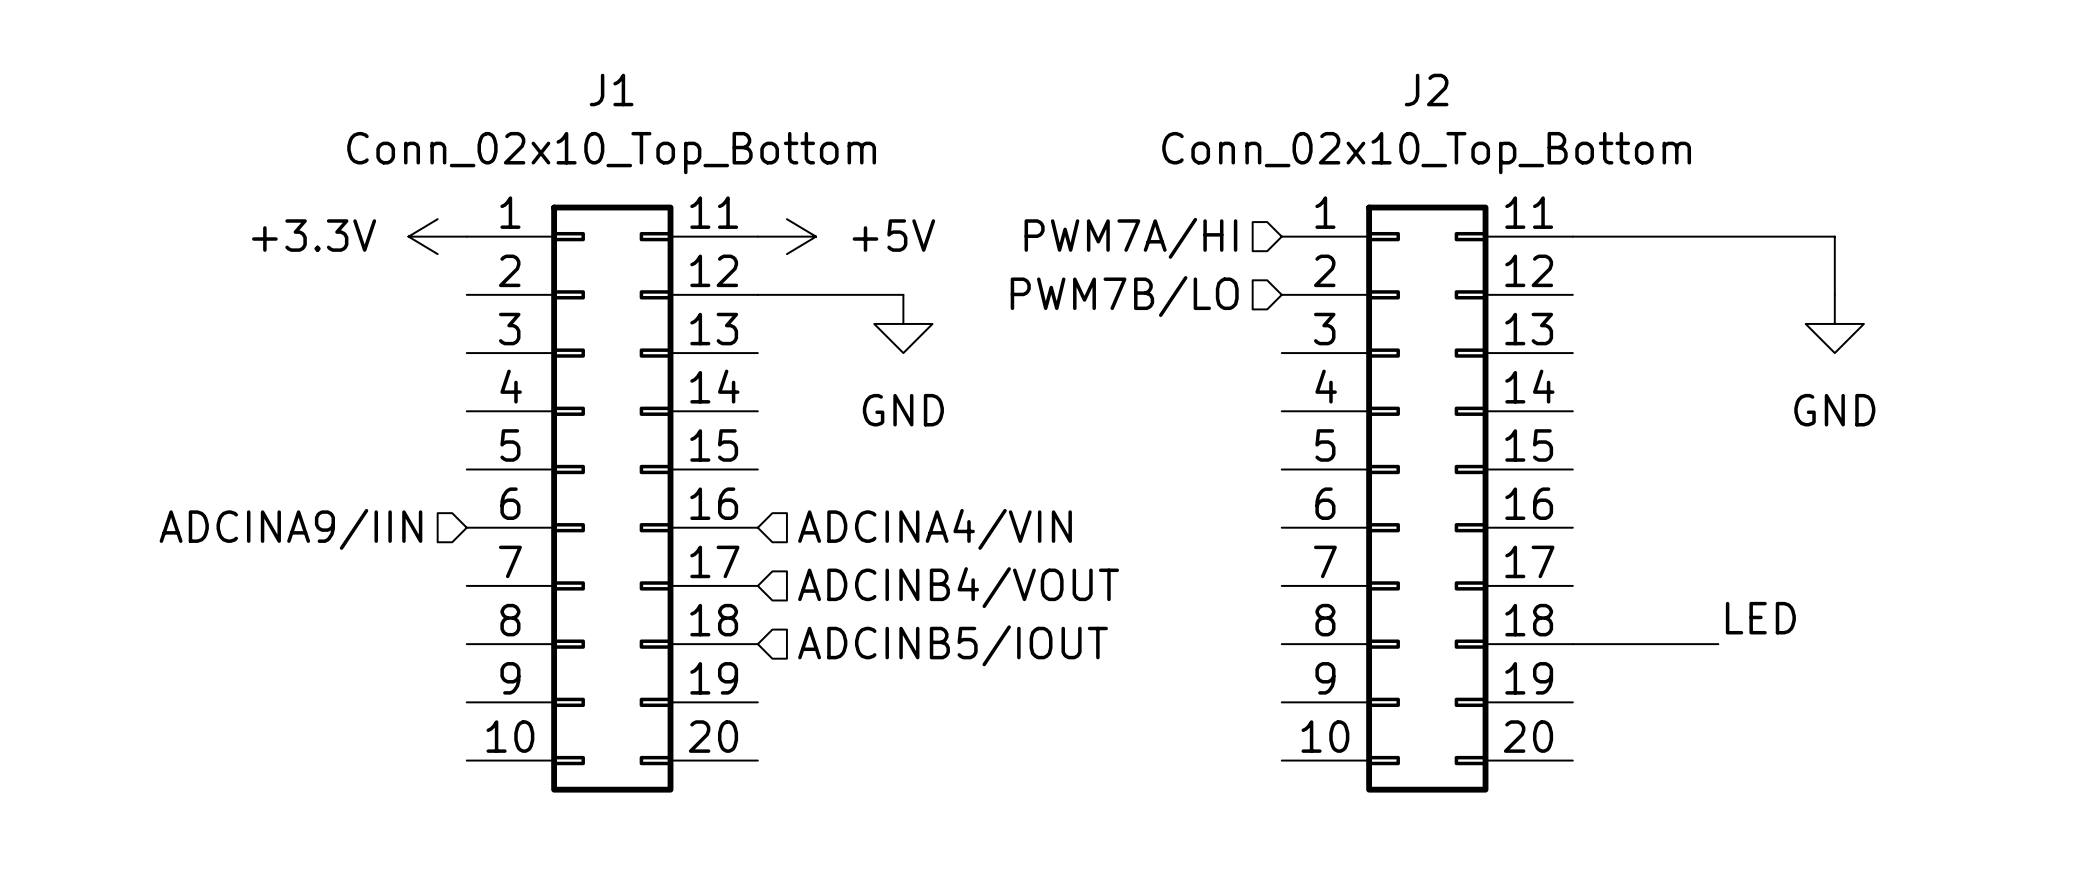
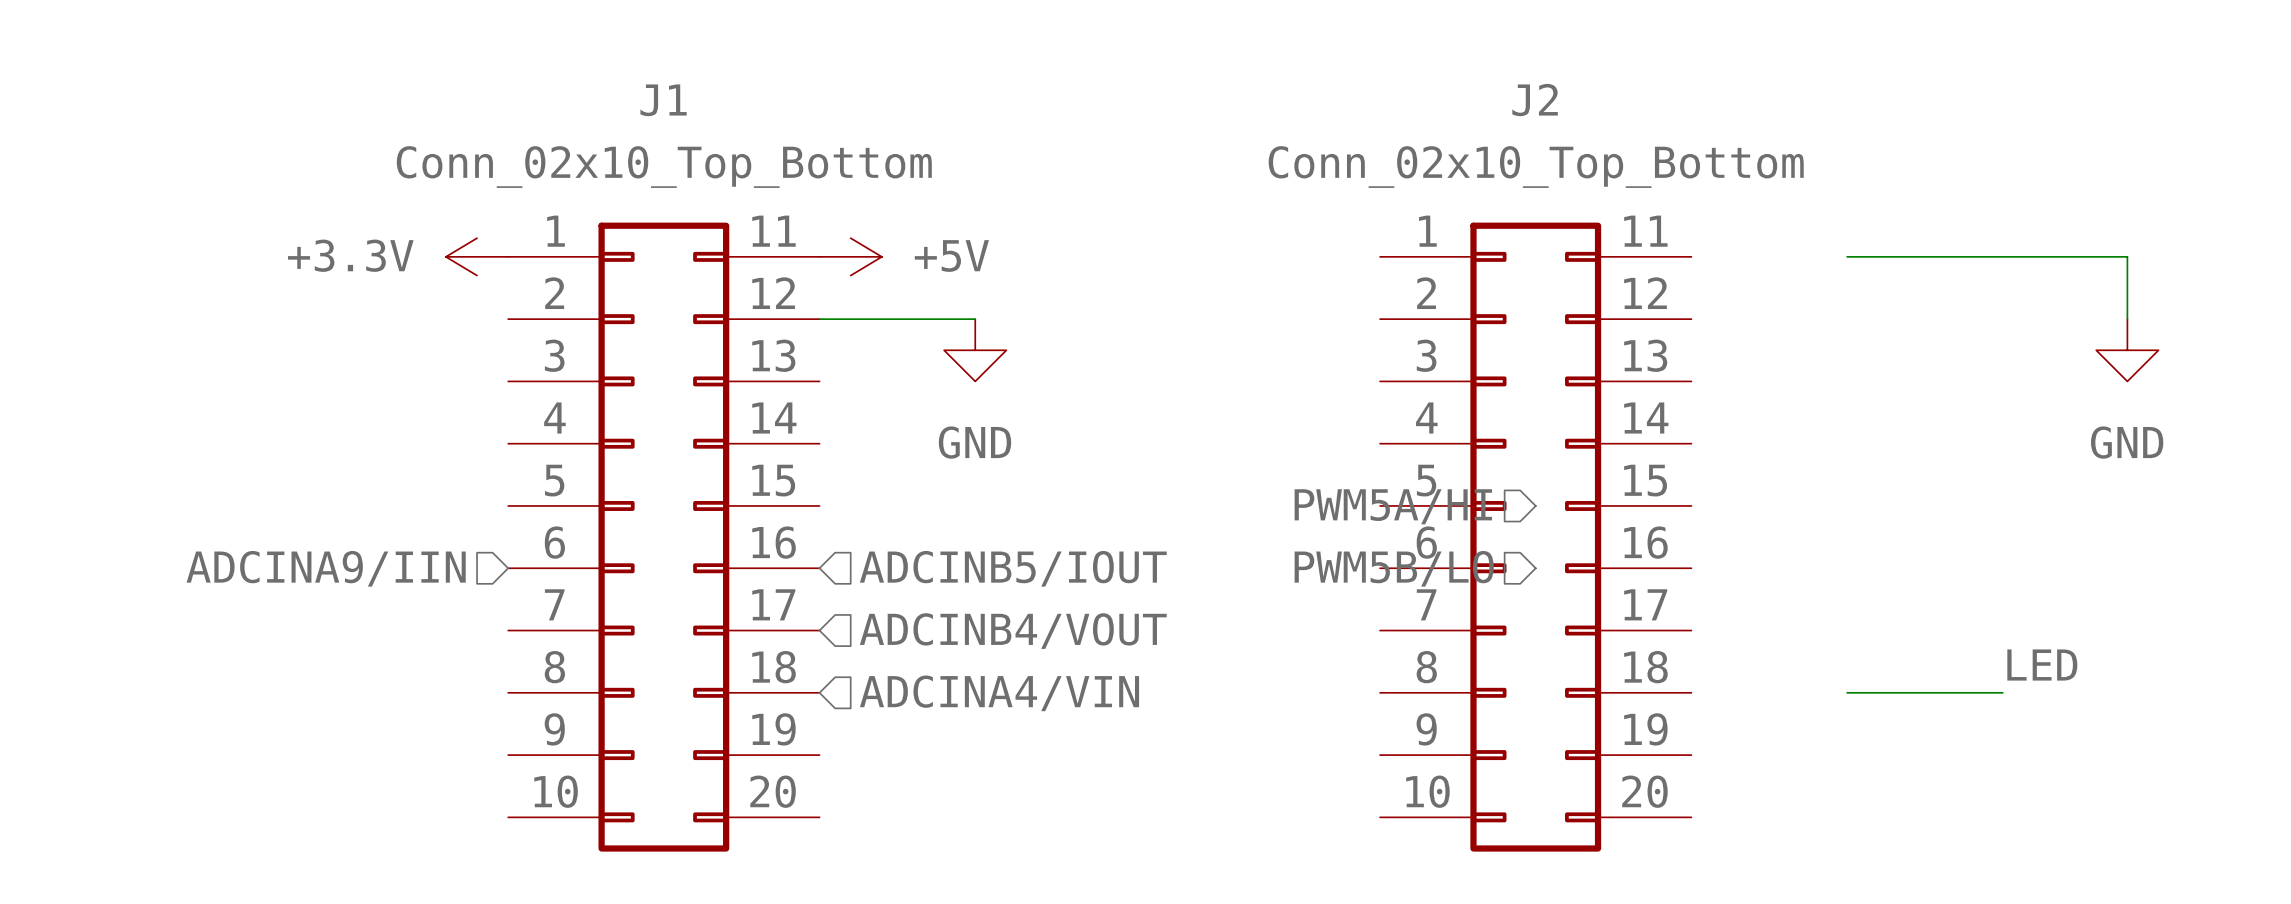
wire: (1572, 236) (1718, 236) -> none
wire: (1834, 236) (1834, 294) -> (1971, 256) (2127, 256) (2127, 319)
hierarchical label: PWM7A/HI (1130, 238) -> none
hierarchical label: PWM7B/LO (1124, 296) -> none
power symbol position: GND (1834, 323) -> GND (2127, 350)
hierarchical label: none -> PWM5A/HI (1393, 506)
hierarchical label: ADCINA4/VIN (935, 529) -> ADCINB5/IOUT (1013, 568)
hierarchical label: none -> PWM5B/LO (1394, 568)
label position: LED (1760, 618) -> LED (2042, 665)
wire: (1572, 644) (1718, 644) -> (2002, 692) (1847, 692)
hierarchical label: ADCINB5/IOUT (953, 645) -> ADCINA4/VIN (999, 693)

